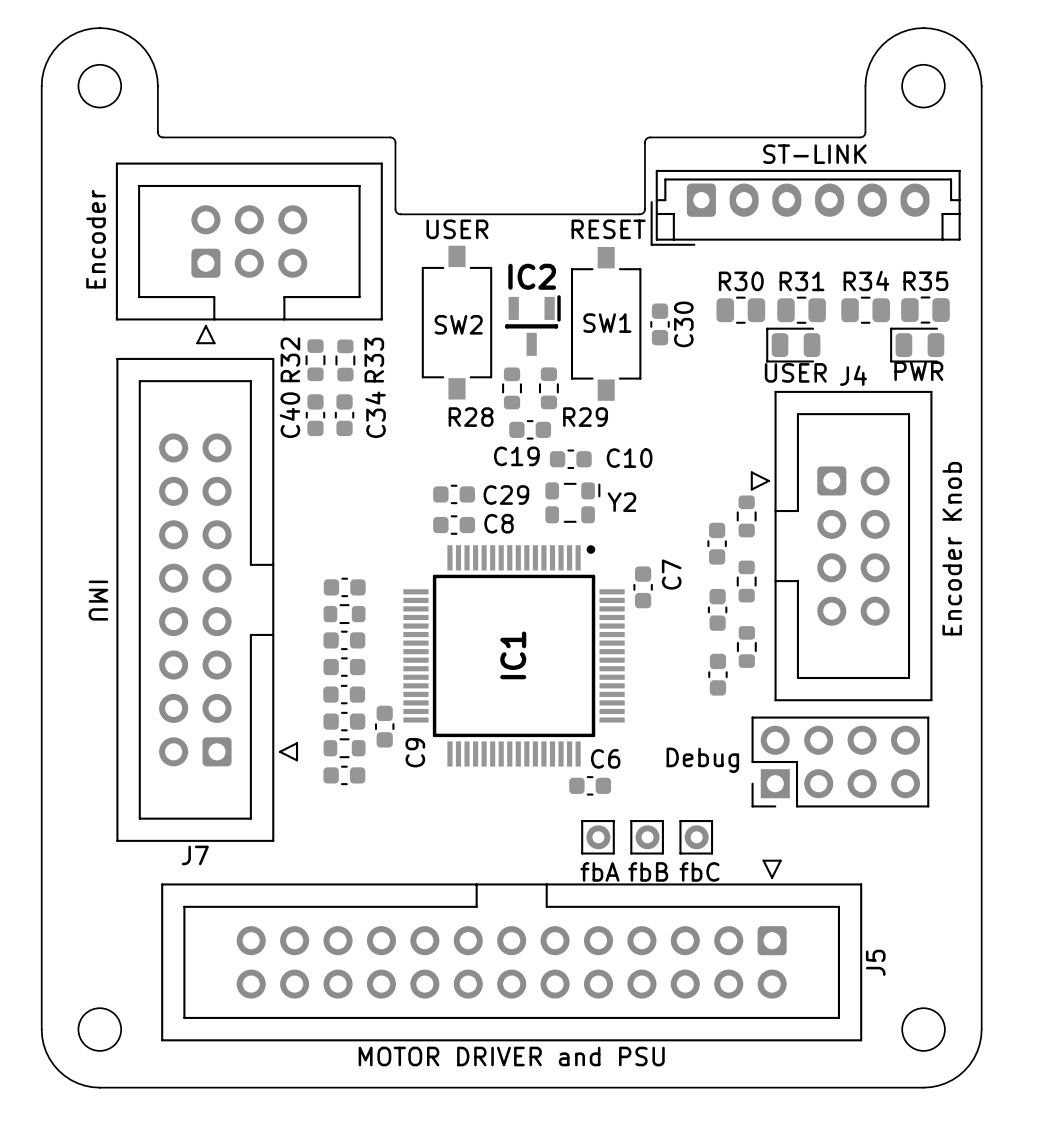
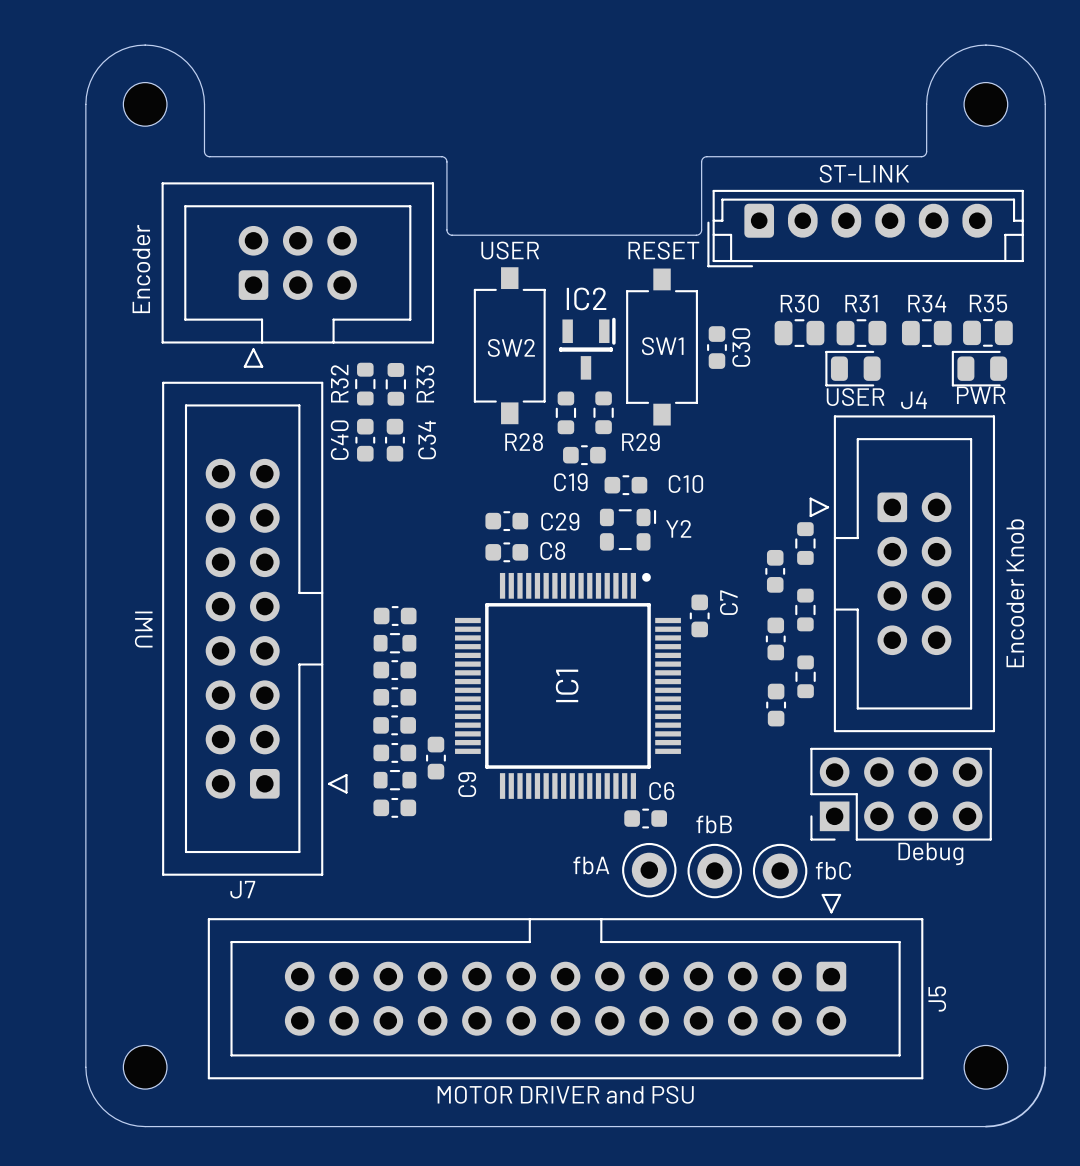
text position: Debug (702, 760) -> Debug (930, 853)
part footprint: [581, 820, 615, 855] -> [622, 842, 677, 898]
part footprint: [630, 820, 664, 855] -> [687, 843, 742, 899]
part: (696, 837) -> none
part: none -> (780, 871)
text position: fbA (599, 871) -> fbA (591, 865)
text position: fbB (648, 871) -> fbB (714, 824)
text position: fbC (699, 871) -> fbC (833, 870)

